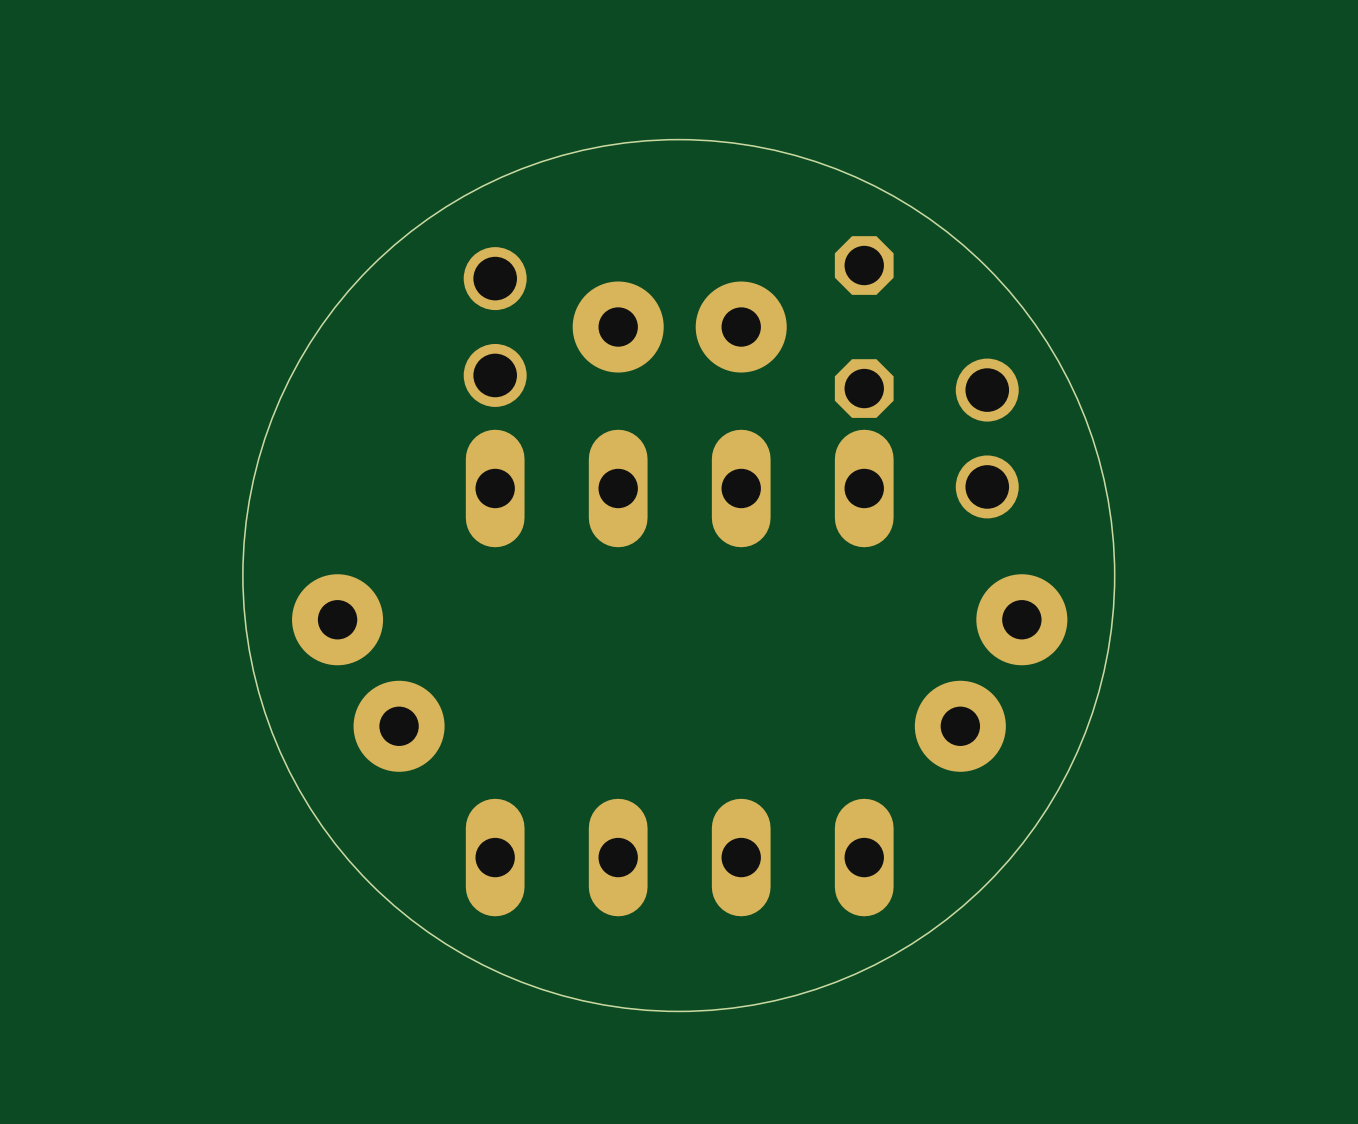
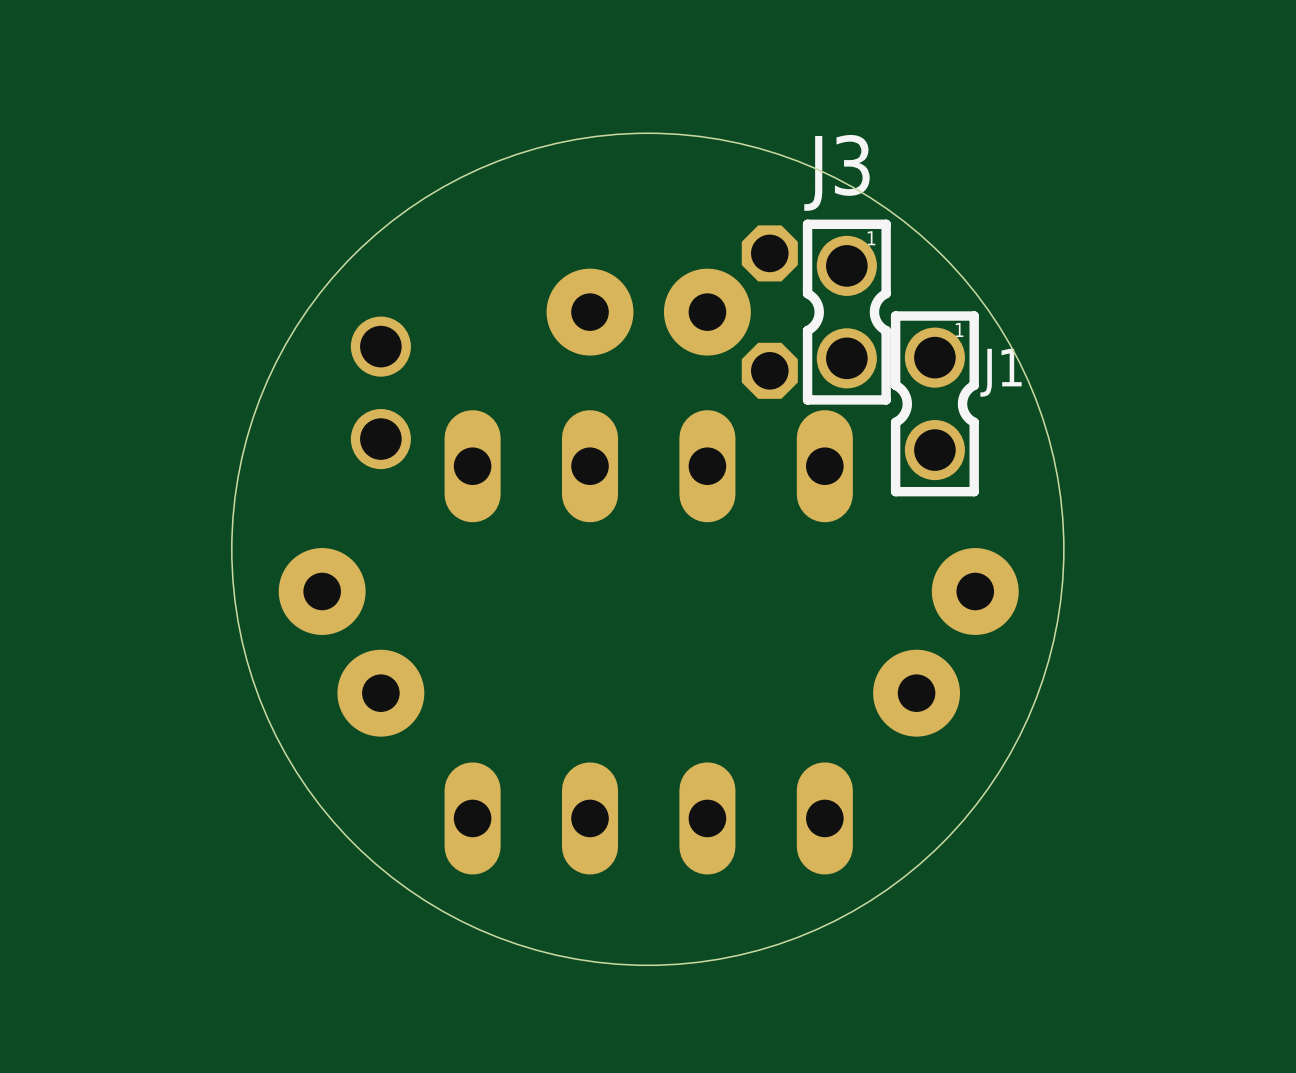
part position: (495, 327) -> (380, 392)
part position: (864, 327) -> (769, 312)
J3: none -> (846, 312)
J1 side: top (987, 438) -> bottom (934, 403)

